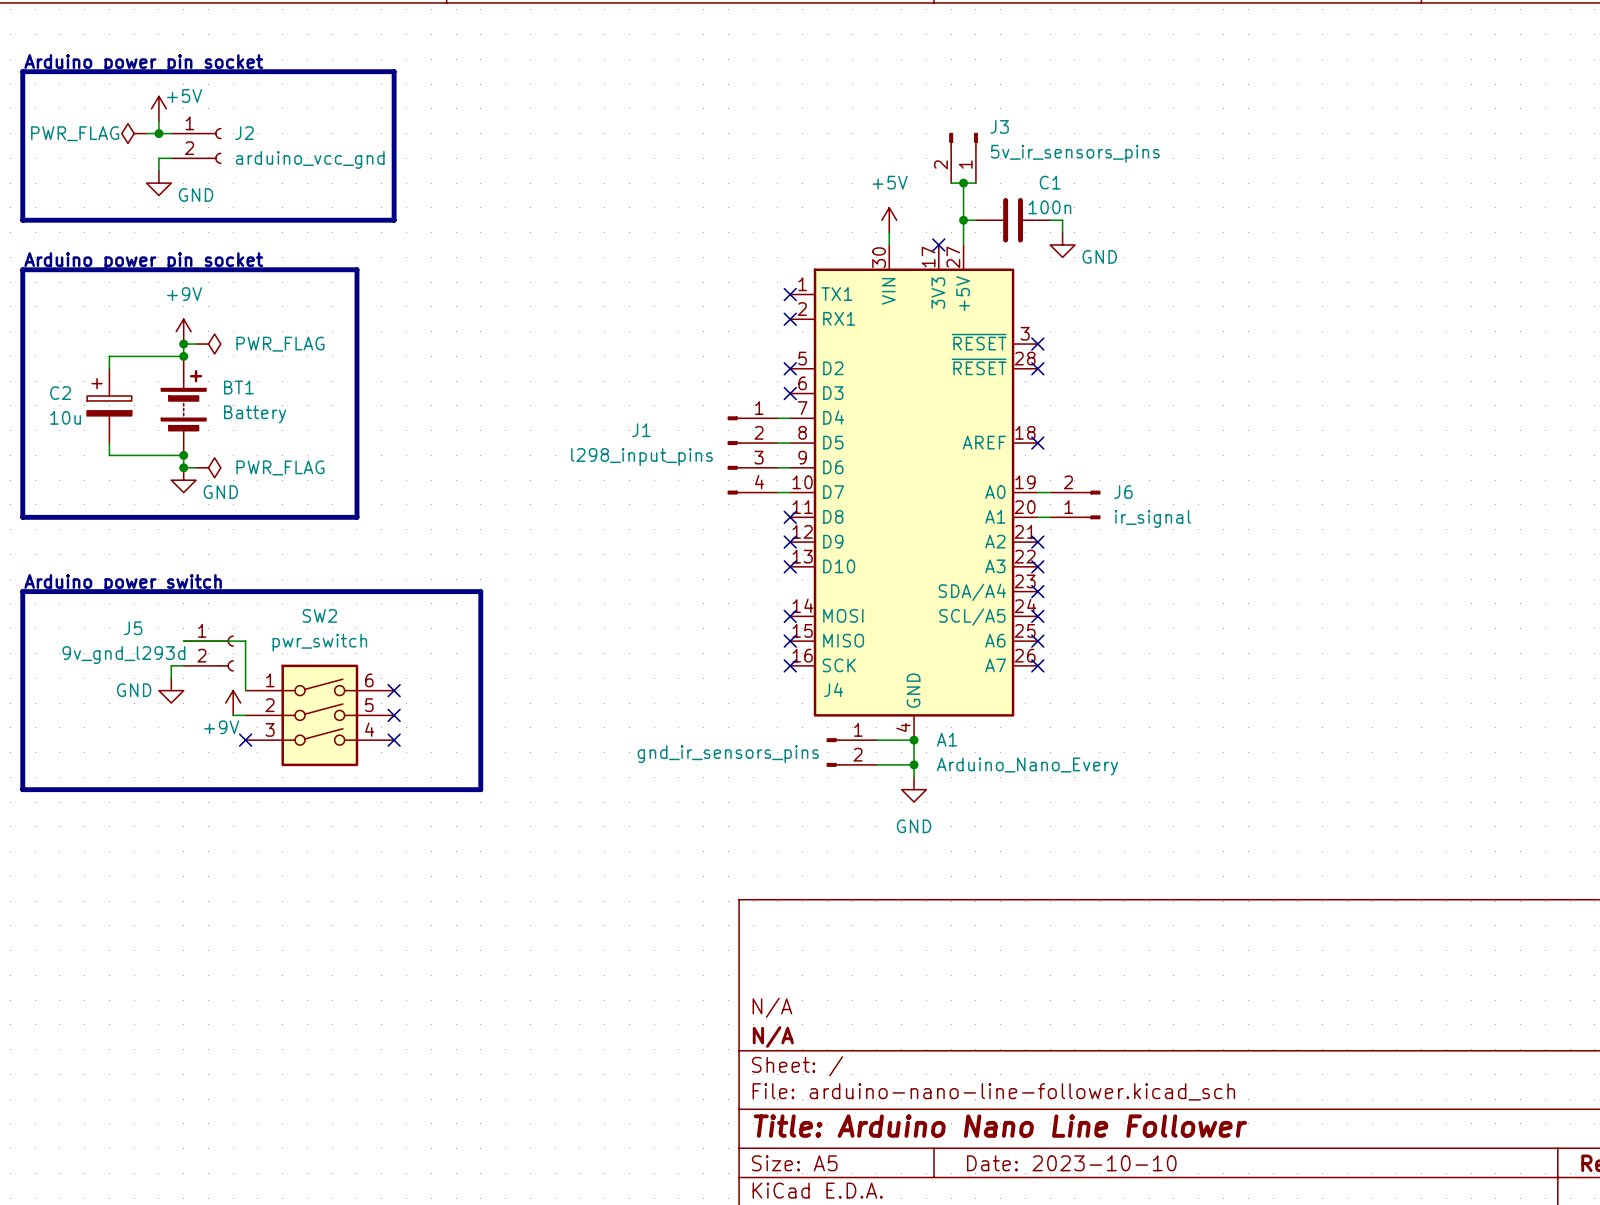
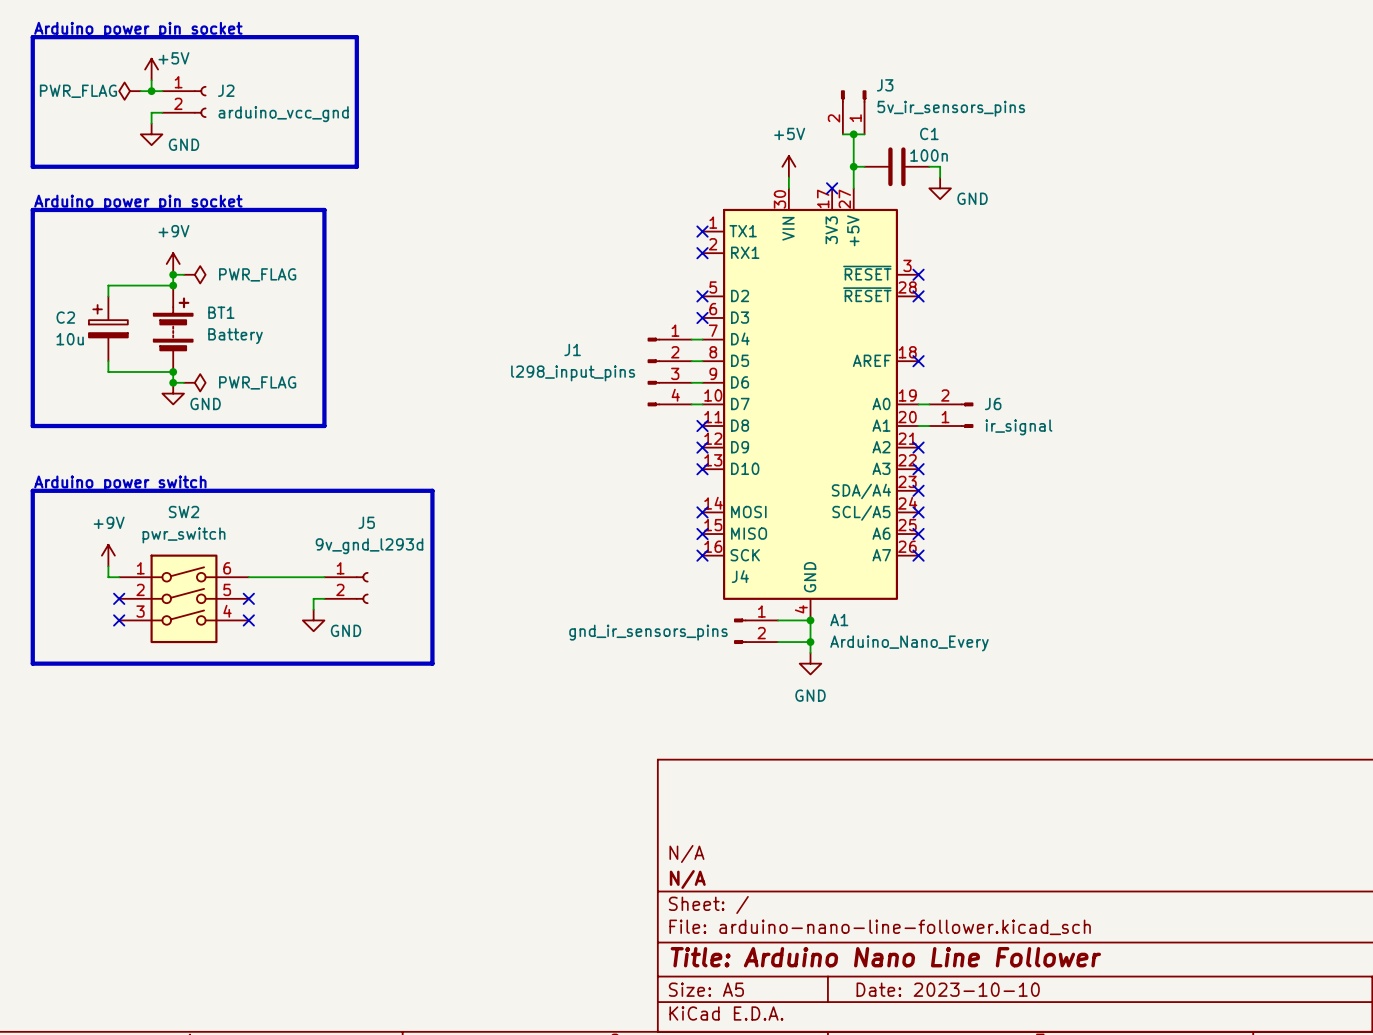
J5 name position: J5 (133, 628) -> J5 (366, 522)
wire: (183, 641) (245, 641) (245, 690) -> none
J5 position: (208, 653) -> (346, 588)
J5 value position: 9v_gnd_l293d (123, 655) -> 9v_gnd_l293d (369, 546)
wire: none -> (108, 566) (108, 577) (119, 577)
power symbol text position: GND (134, 690) -> GND (346, 630)
power symbol position: GND (171, 690) -> GND (313, 620)
no-connect mark: (394, 690) -> none
power symbol position: +9V (233, 703) -> +9V (108, 555)
no-connect mark: none -> (119, 598)
no-connect mark: none -> (248, 598)
SW2 position: (319, 715) -> (184, 598)
no-connect mark: (394, 715) -> none
power symbol text position: +9V (221, 727) -> +9V (109, 522)
no-connect mark: none -> (119, 620)
no-connect mark: (245, 740) -> none
no-connect mark: none -> (248, 620)
no-connect mark: (394, 740) -> none

